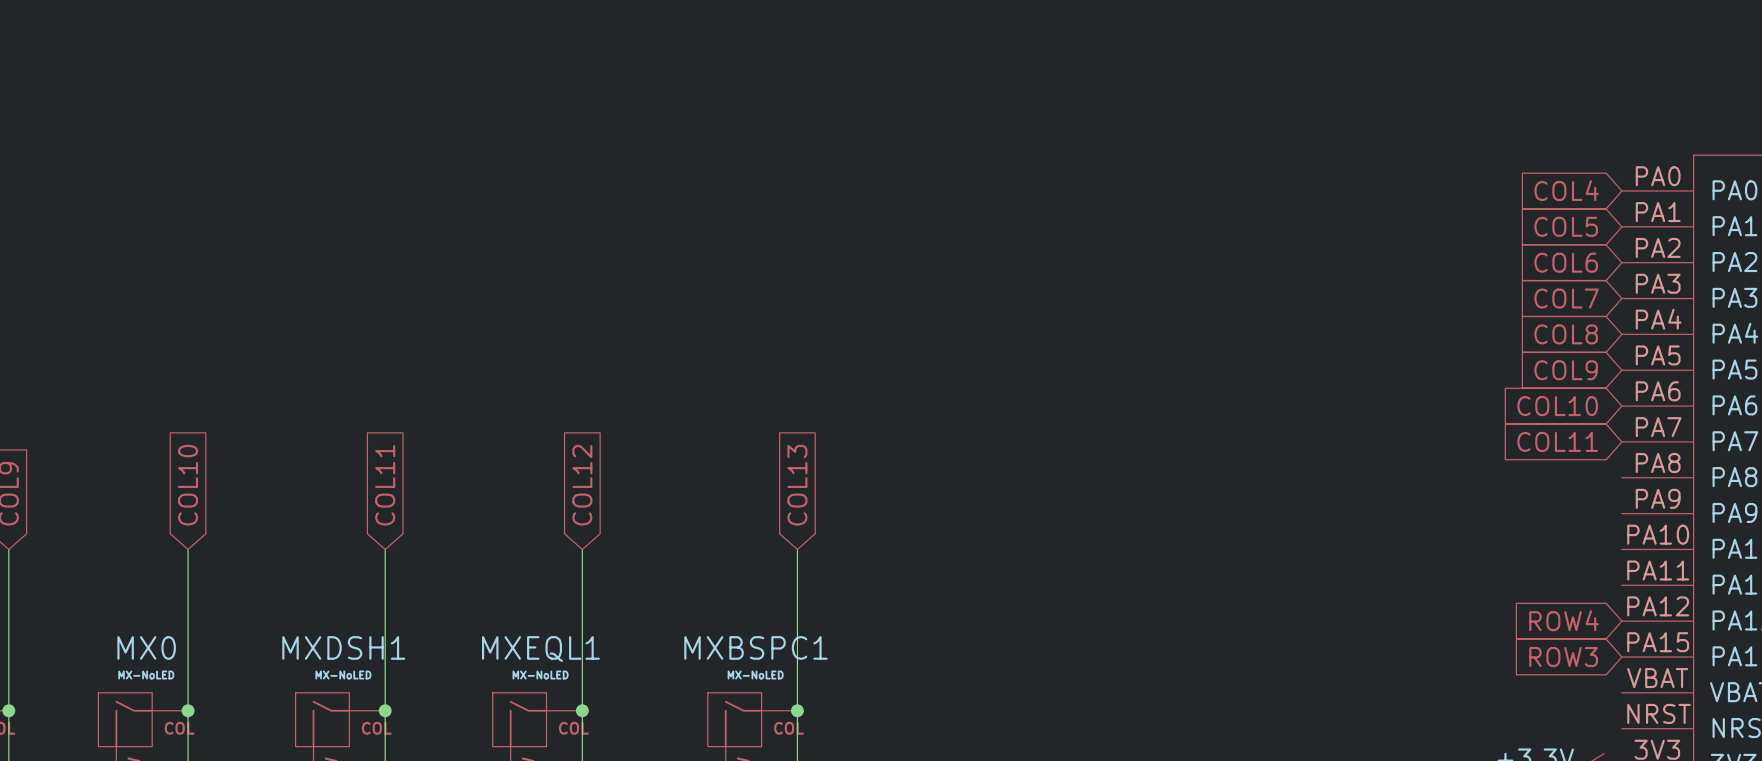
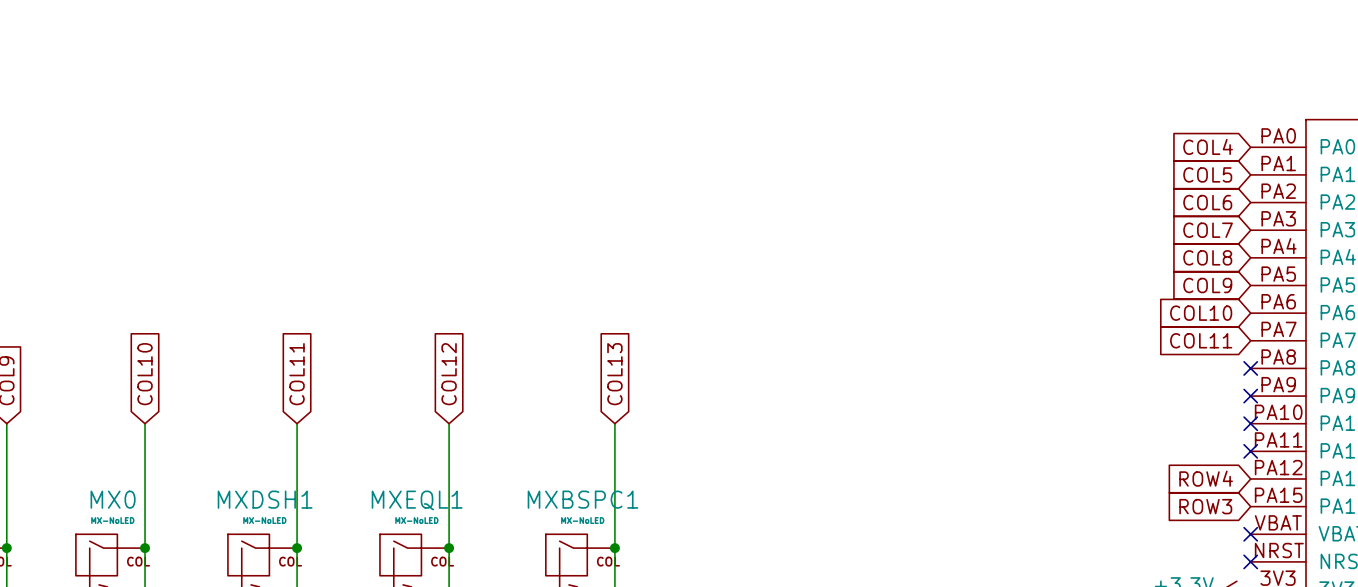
no-connect mark: none -> (1250, 368)
no-connect mark: none -> (1250, 396)
no-connect mark: none -> (1250, 423)
no-connect mark: none -> (1250, 451)
no-connect mark: none -> (1250, 534)
no-connect mark: none -> (1250, 561)

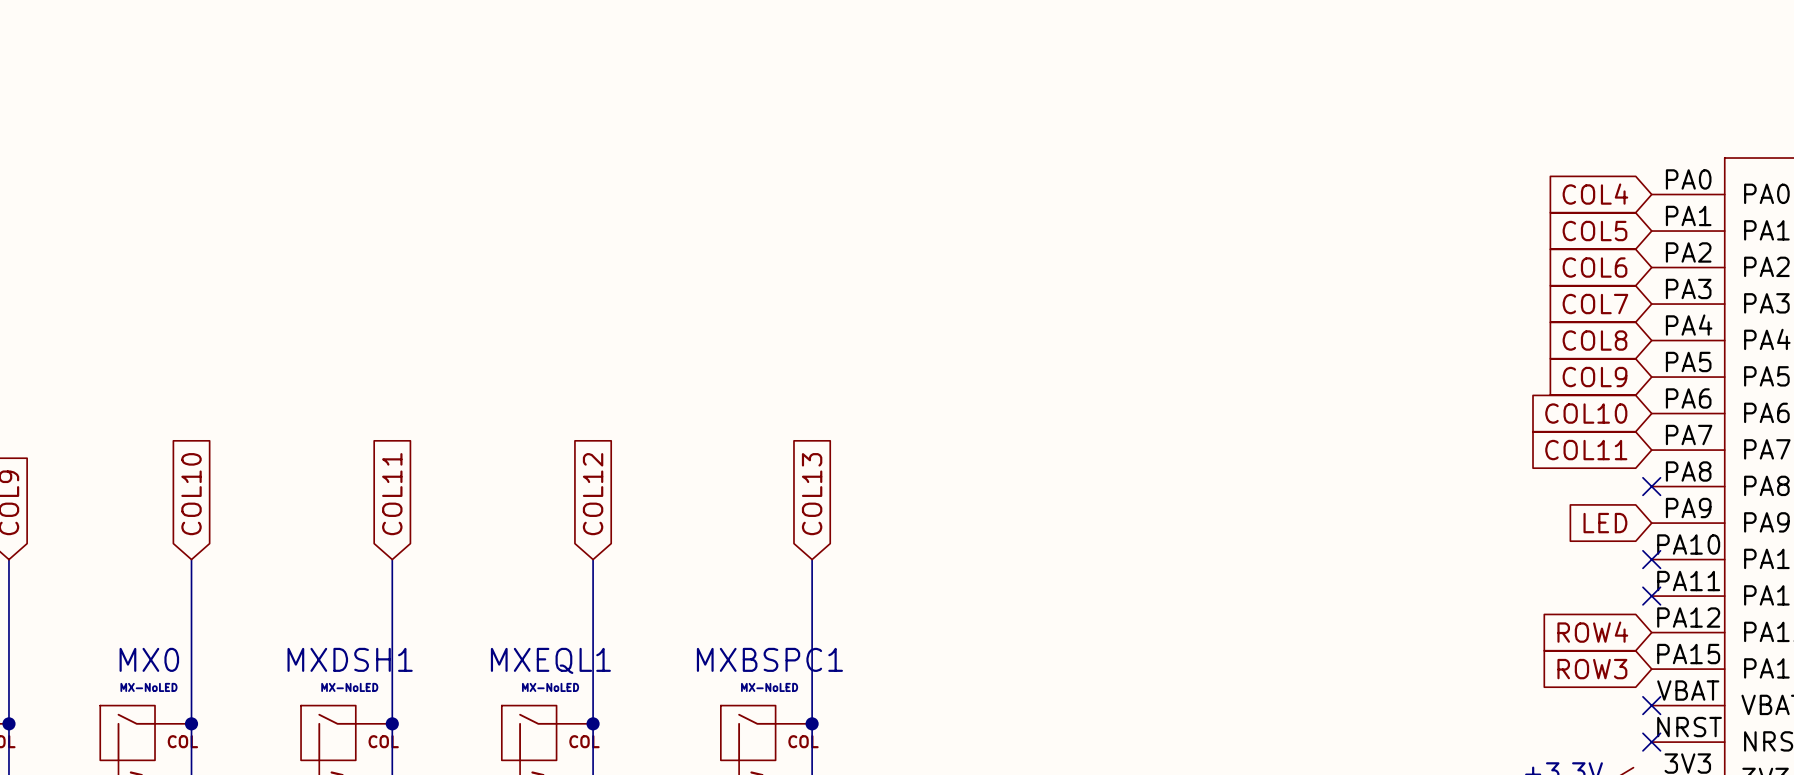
global label: none -> LED (1605, 523)
no-connect mark: (1250, 396) -> none

